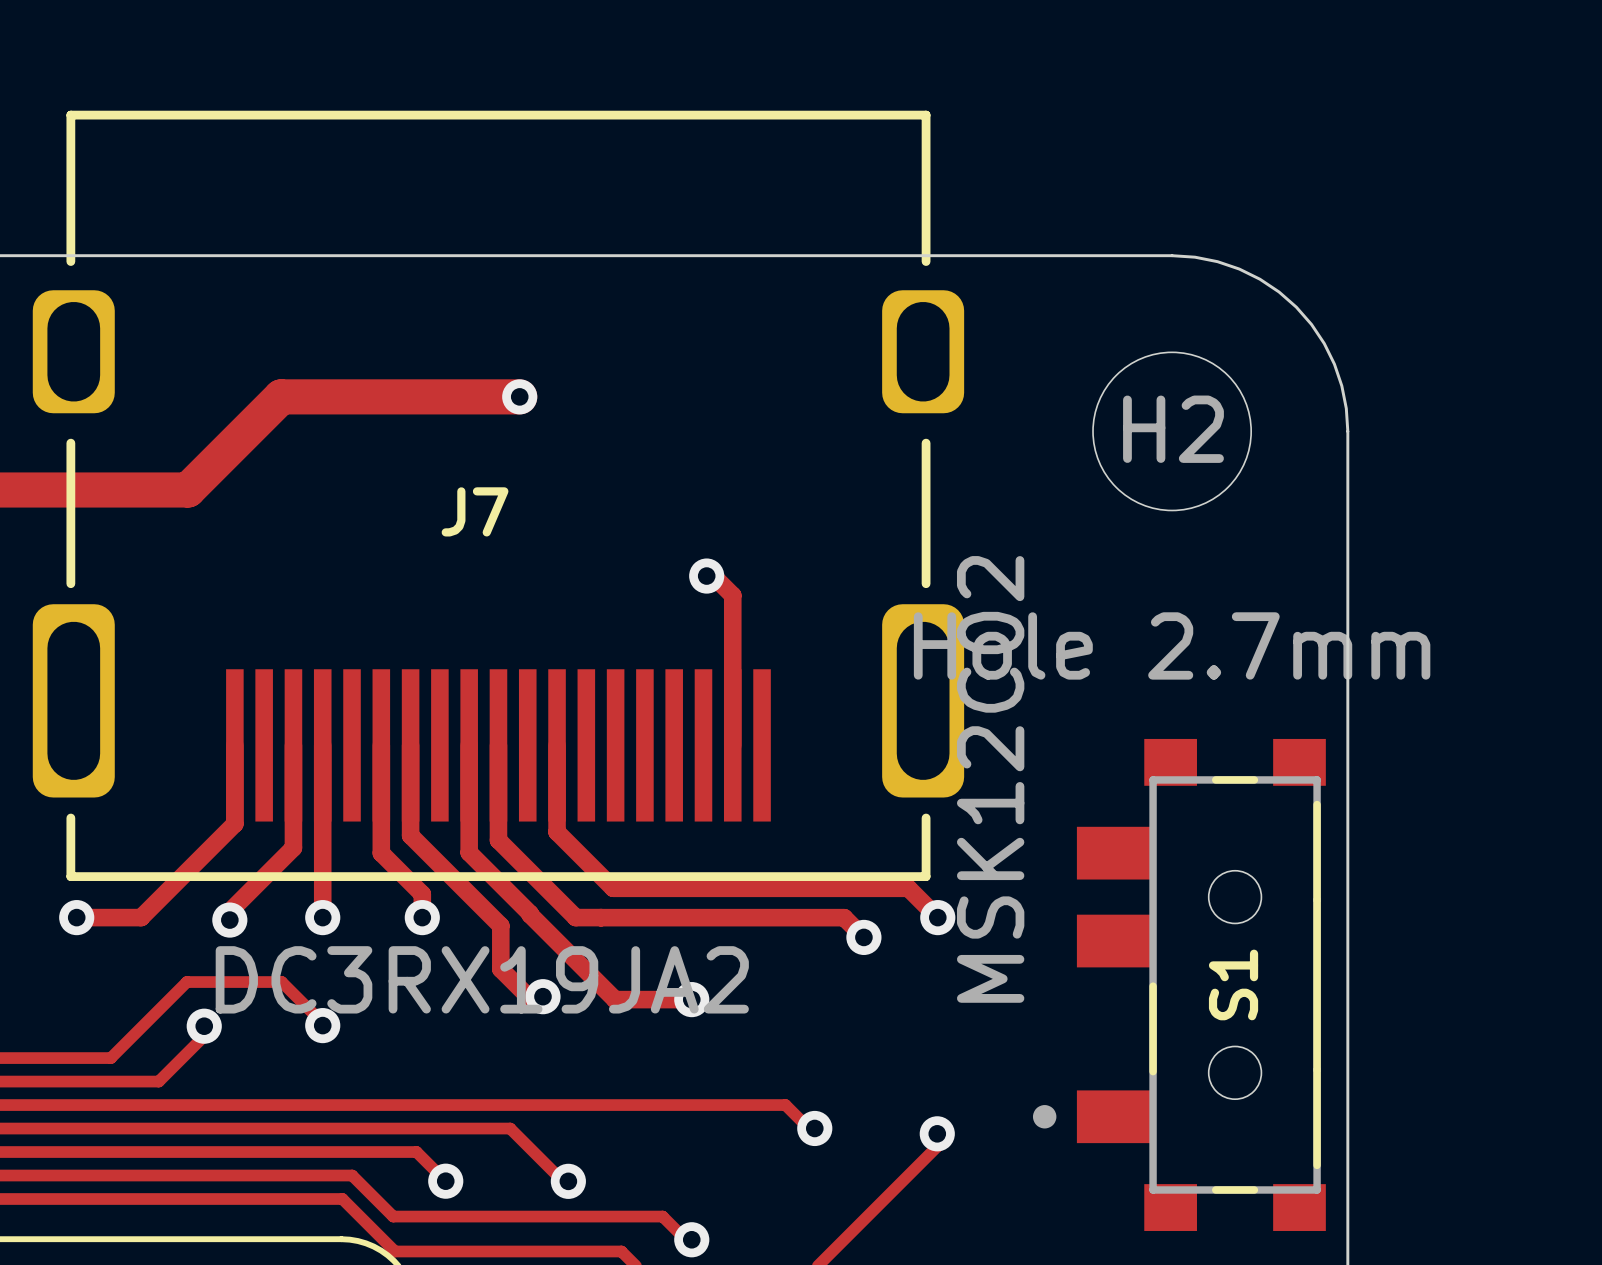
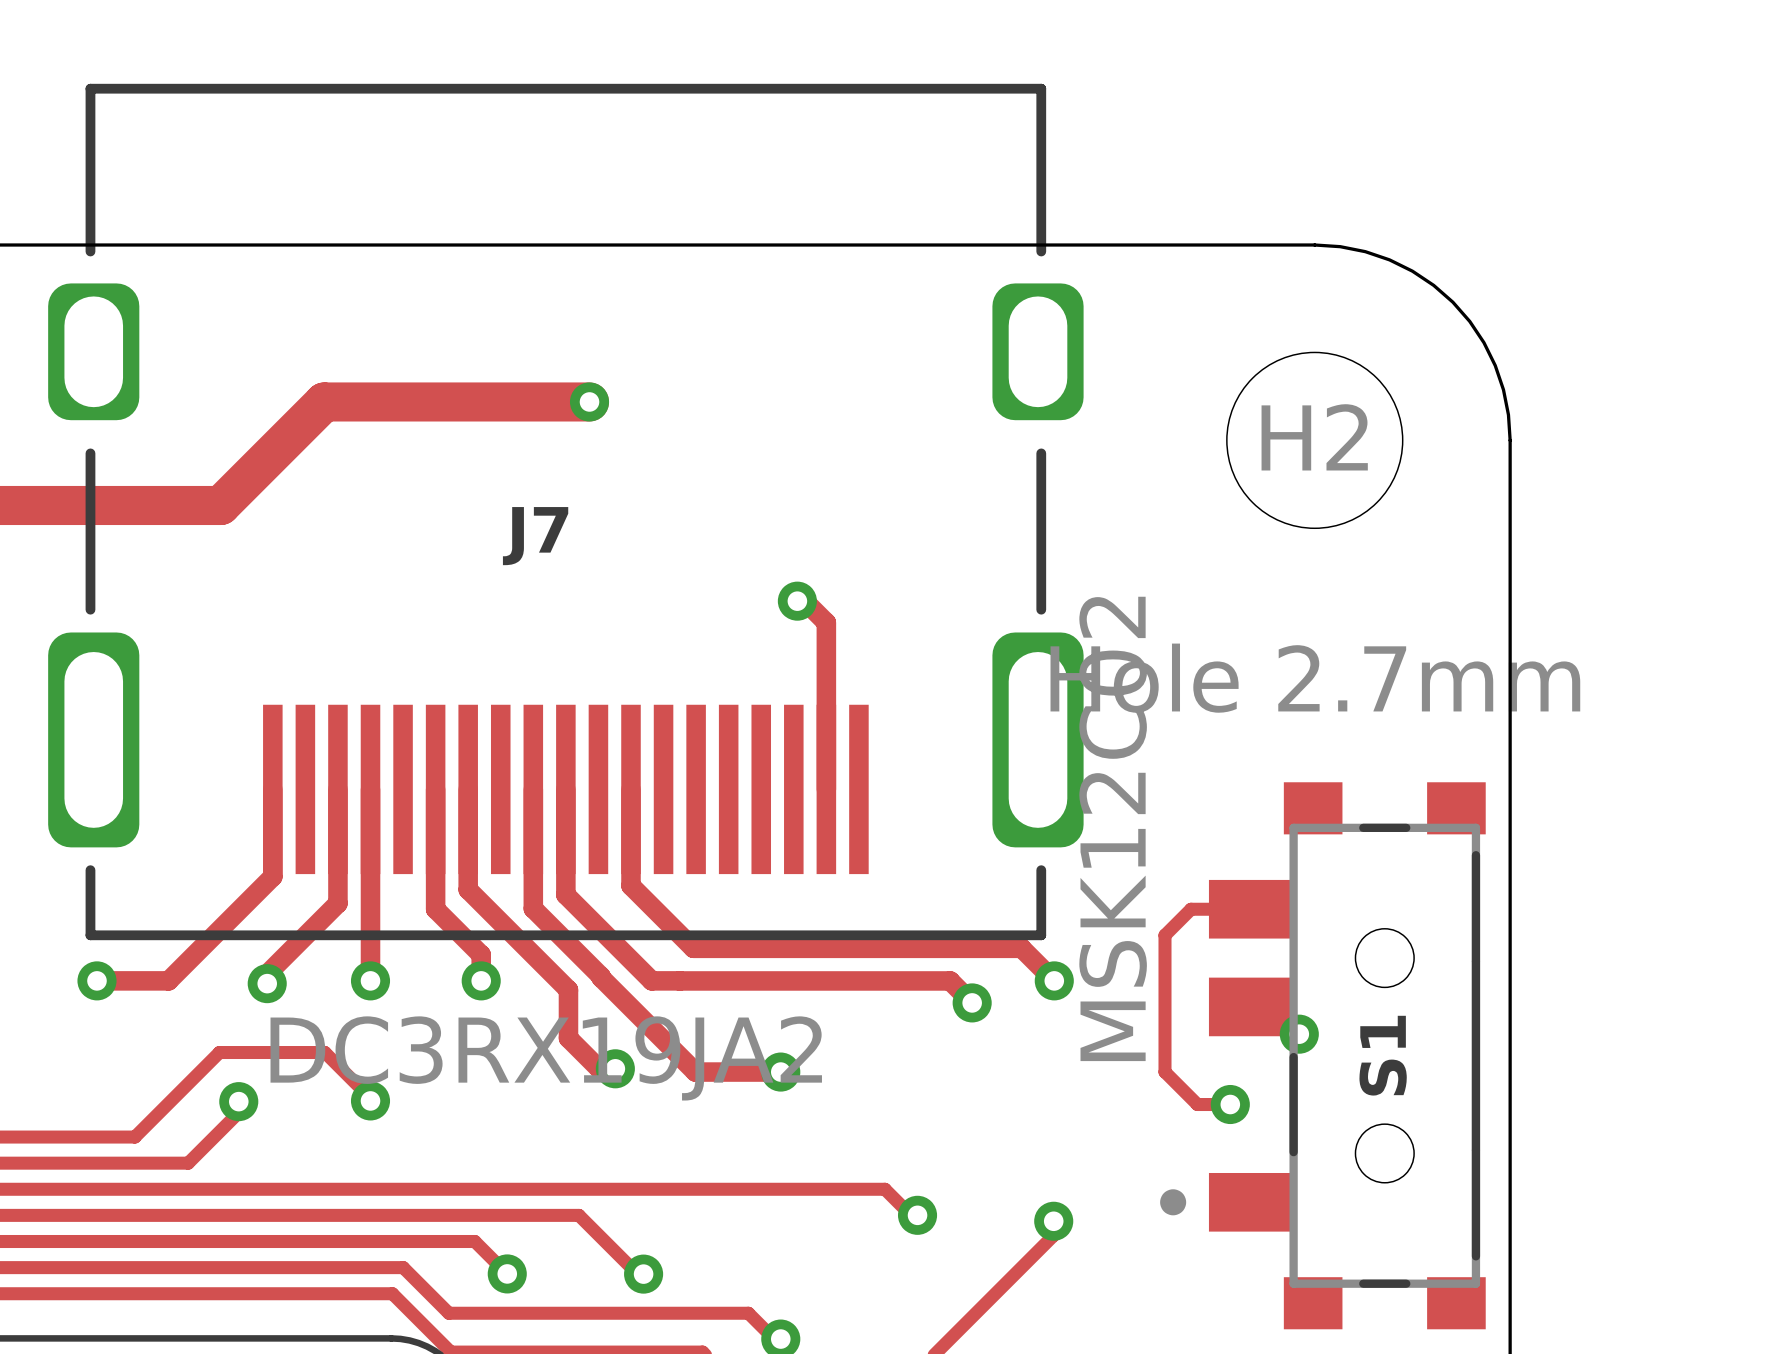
track: none -> (1249, 909) (1191, 909) (1164, 935) (1164, 1072) (1197, 1104) (1230, 1104)
via: none -> (1299, 1034)
via: none -> (1230, 1104)

